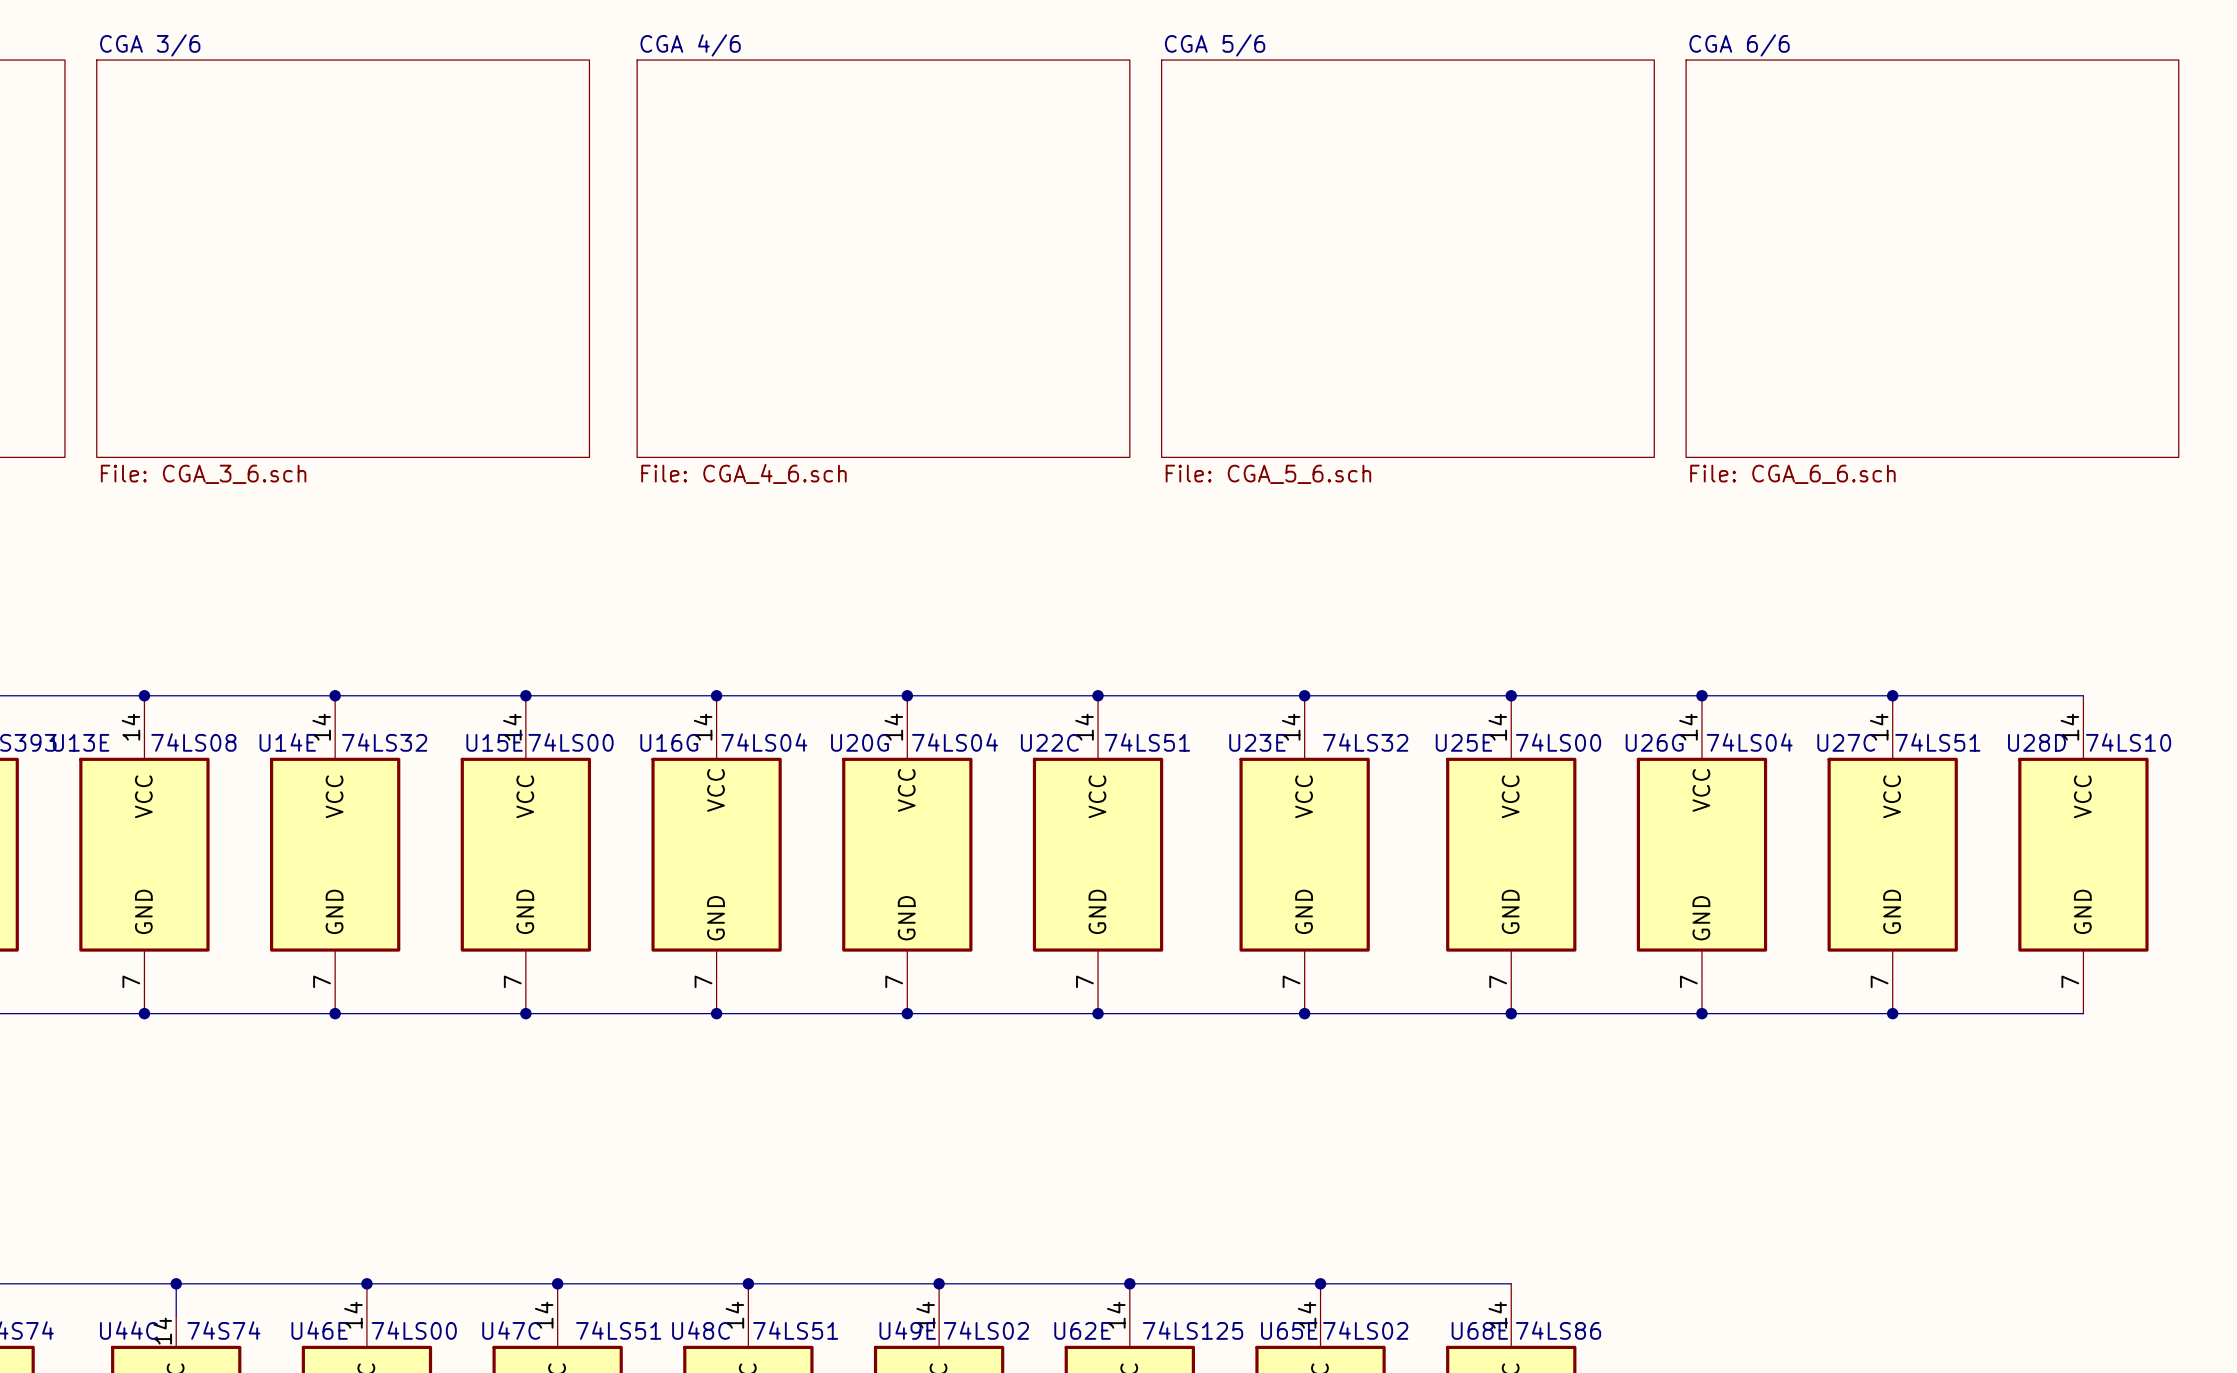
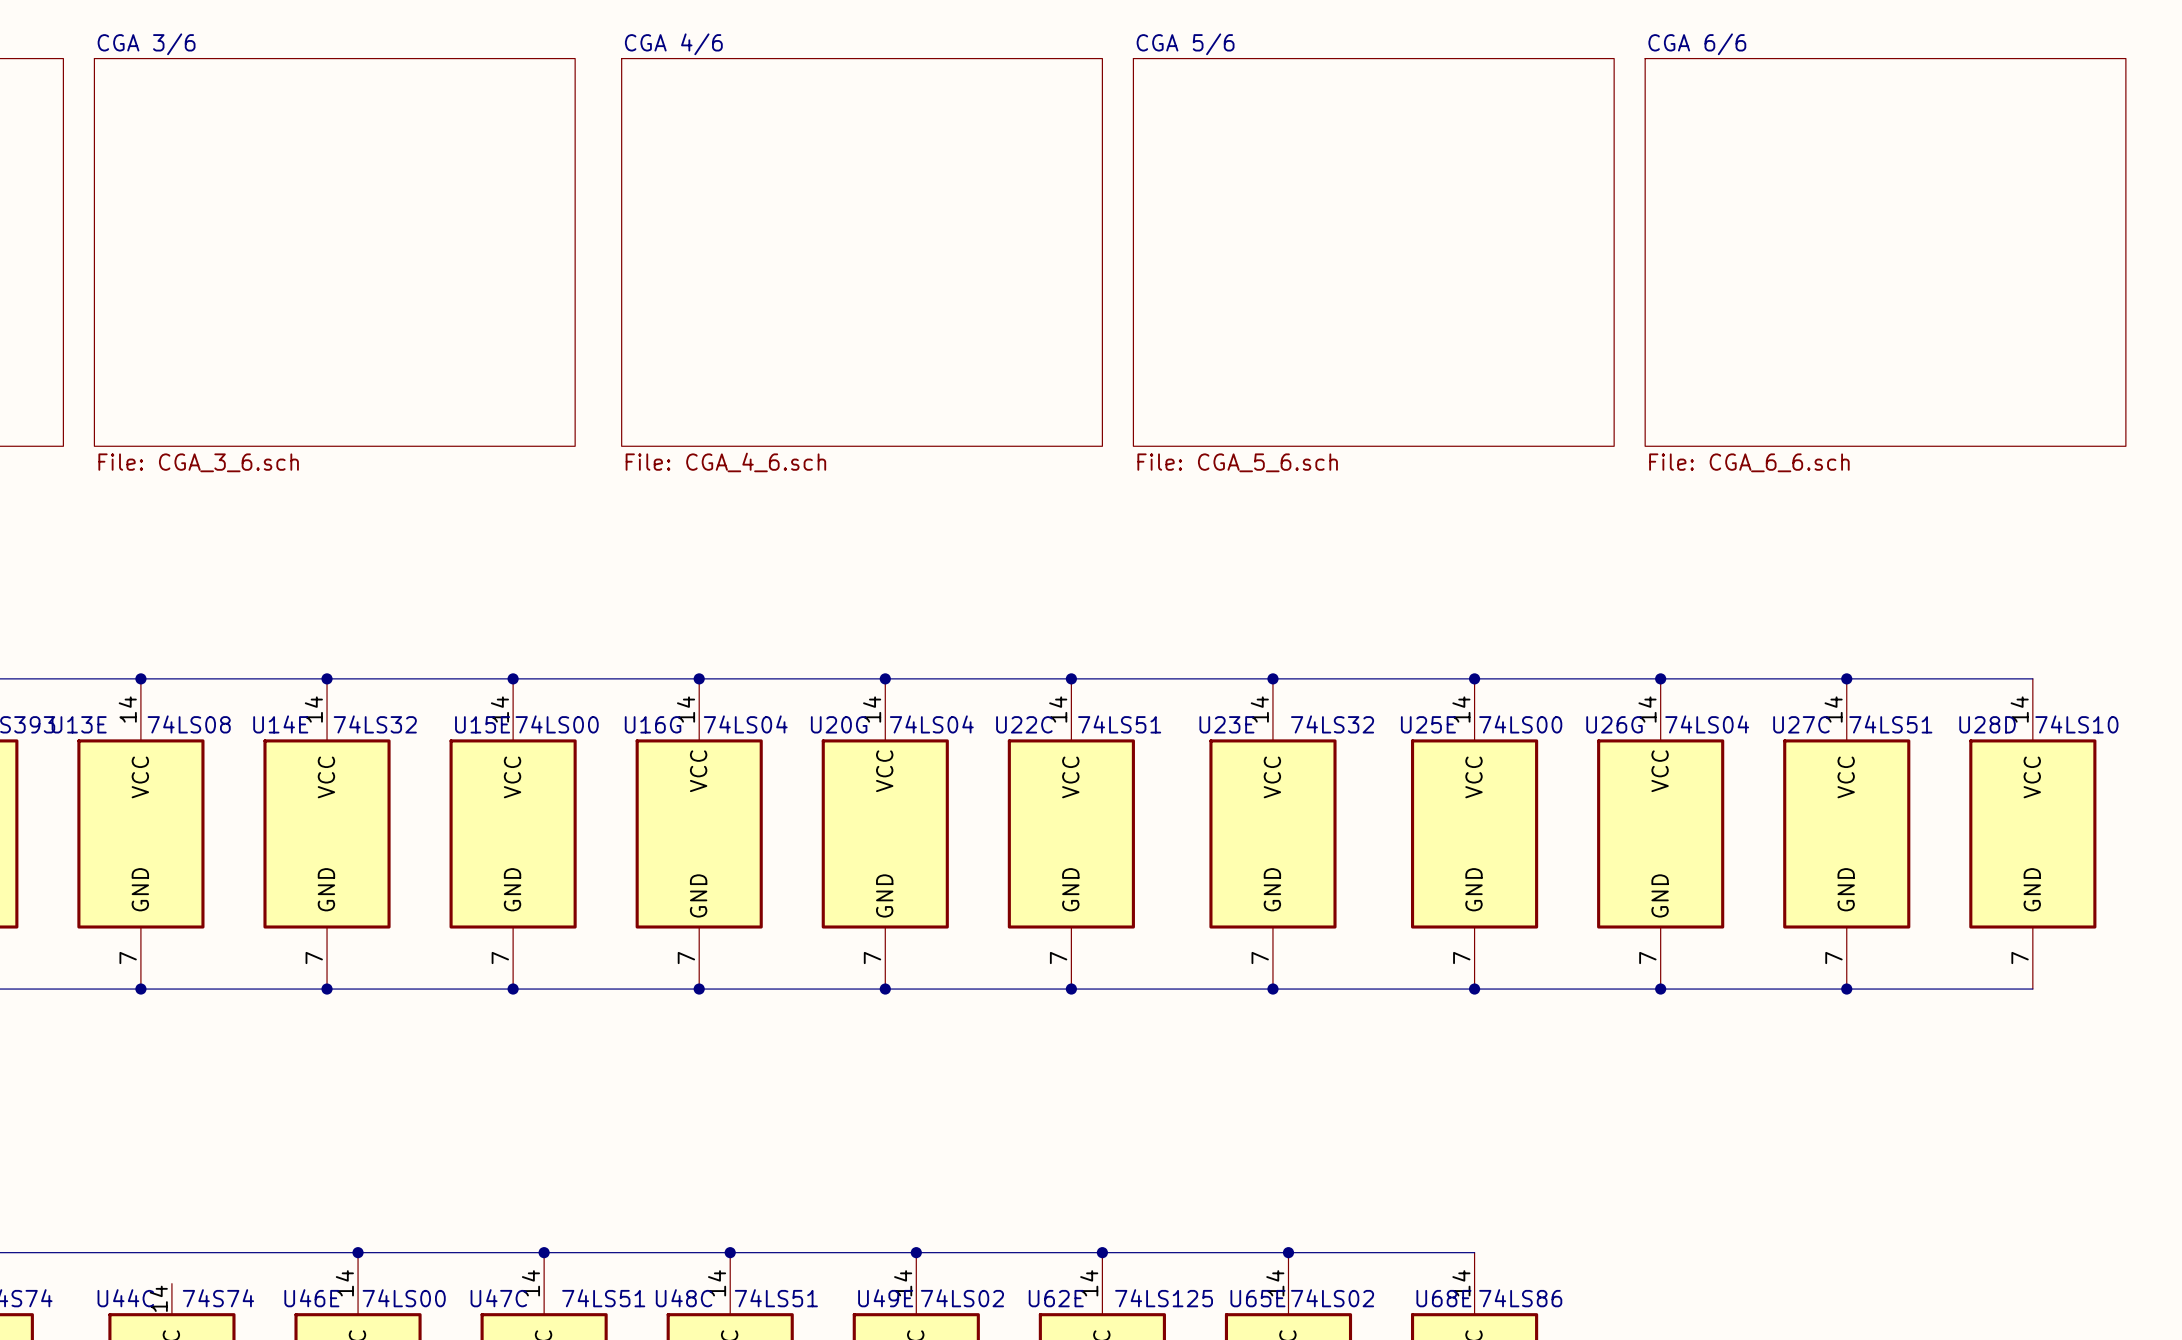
wire: (176, 1283) (176, 1315) -> none
junction: (176, 1283) -> none

